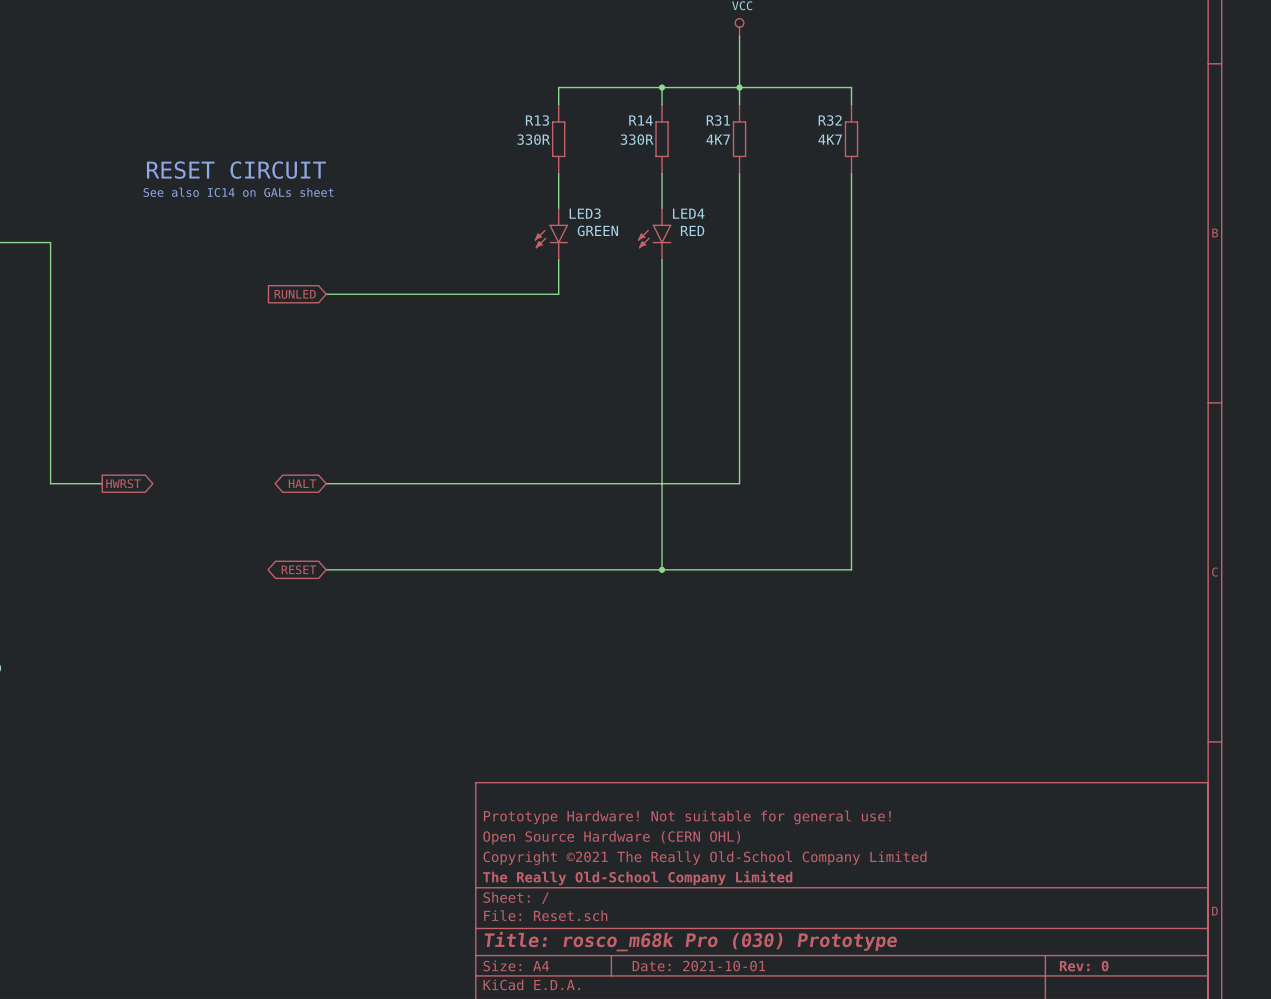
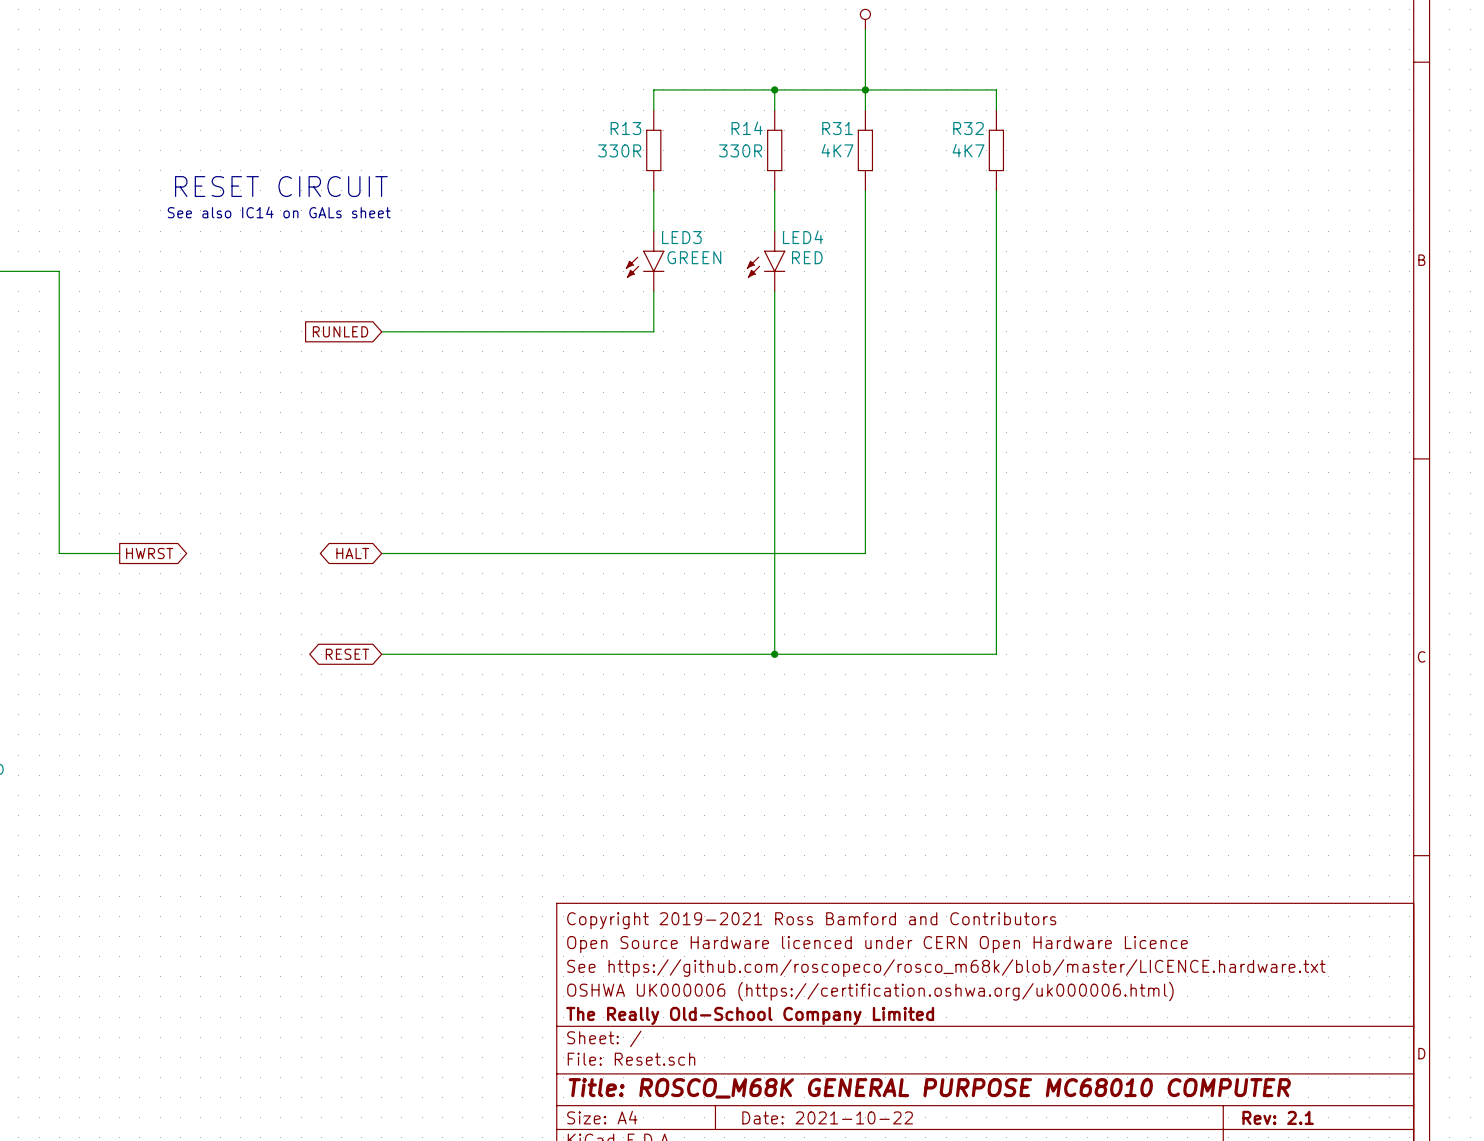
title block: none -> Copyright 2019-2021 Ross Bamford and Contributors (811, 920)
title block: Prototype Hardware! Not suitable for general use! (687, 817) -> Open Source Hardware licenced under CERN Open Hardware Licence (877, 944)
title block: Open Source Hardware (CERN OHL) (611, 837) -> See https://github.com/roscopeco/rosco_m68k/blob/master/LICENCE.hardware.txt (946, 968)
title block: Copyright ©2021 The Really Old-School Company Limited (704, 858) -> OSHWA UK000006 (https://certification.oshwa.org/uk000006.html) (870, 991)
title block: Title: rosco_m68k Pro (030) Prototype (690, 941) -> Title: ROSCO_M68K GENERAL PURPOSE MC68010 COMPUTER (929, 1088)
title block: Date: 2021-10-01 (698, 966) -> Date: 2021-10-22 (827, 1117)
title block: Rev: 0 (1084, 966) -> Rev: 2.1 (1278, 1117)

